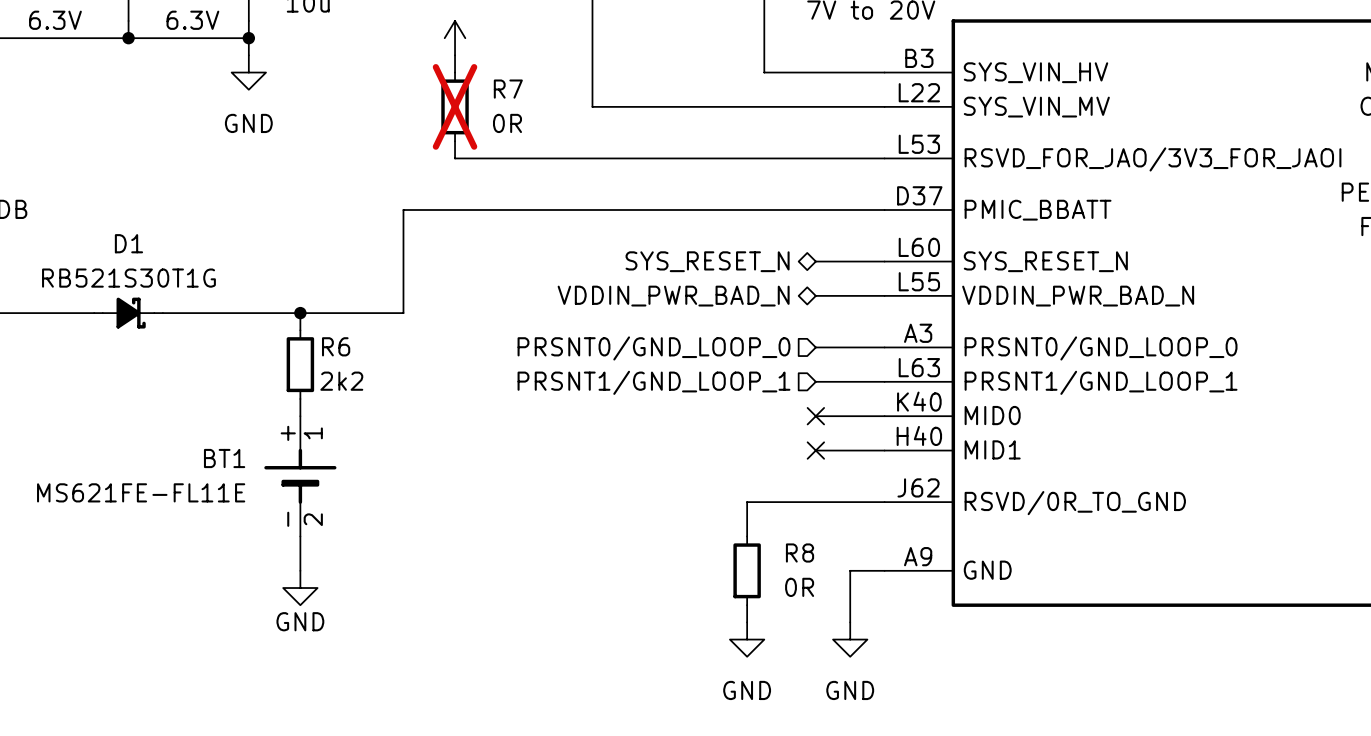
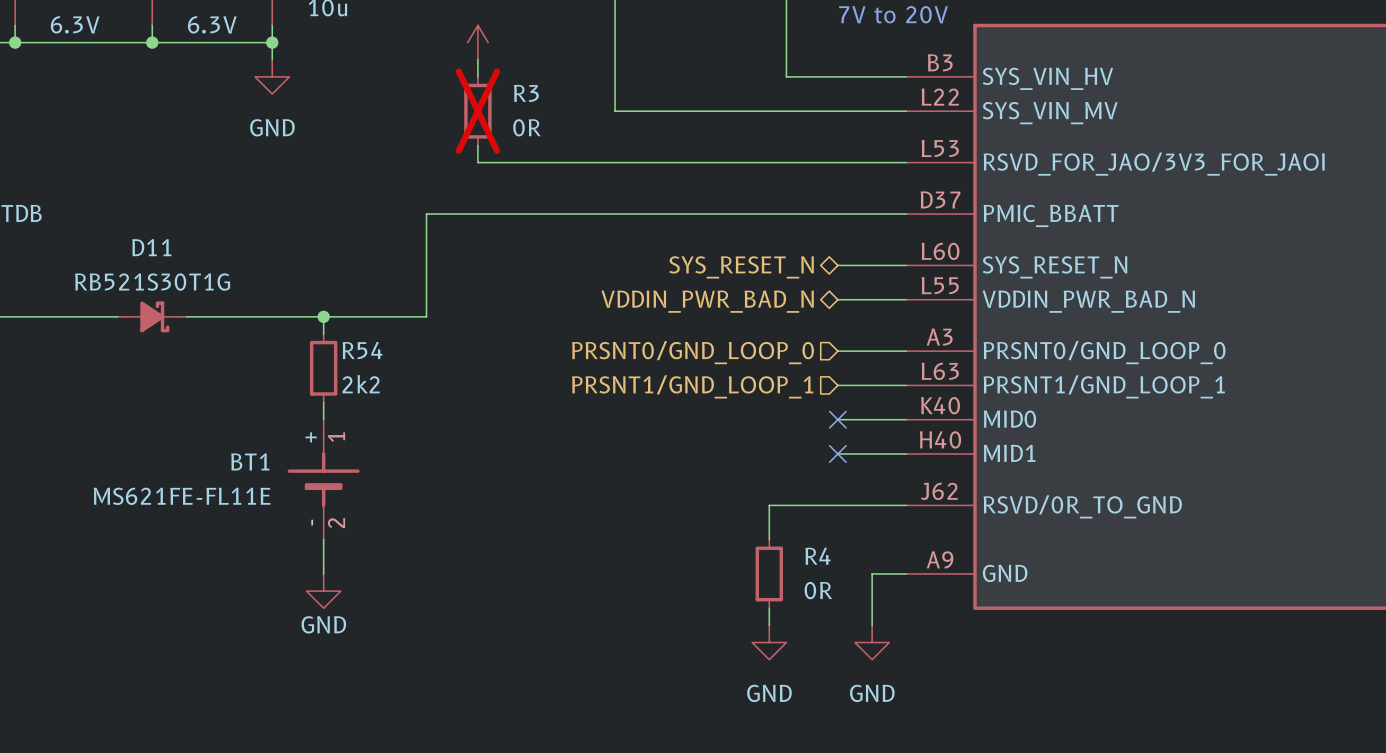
R7 name: R7 (508, 89) -> R3 (526, 93)
D1 name: D1 (128, 243) -> D11 (151, 247)
R6 name: R6 (336, 346) -> R54 (362, 350)
R8 name: R8 (800, 553) -> R4 (817, 556)

